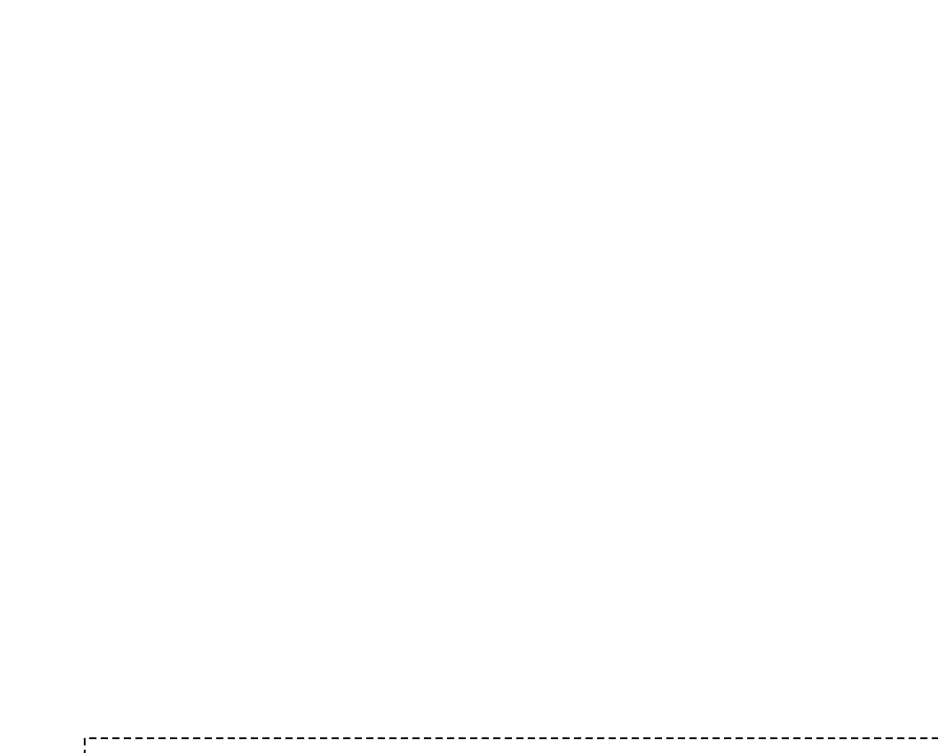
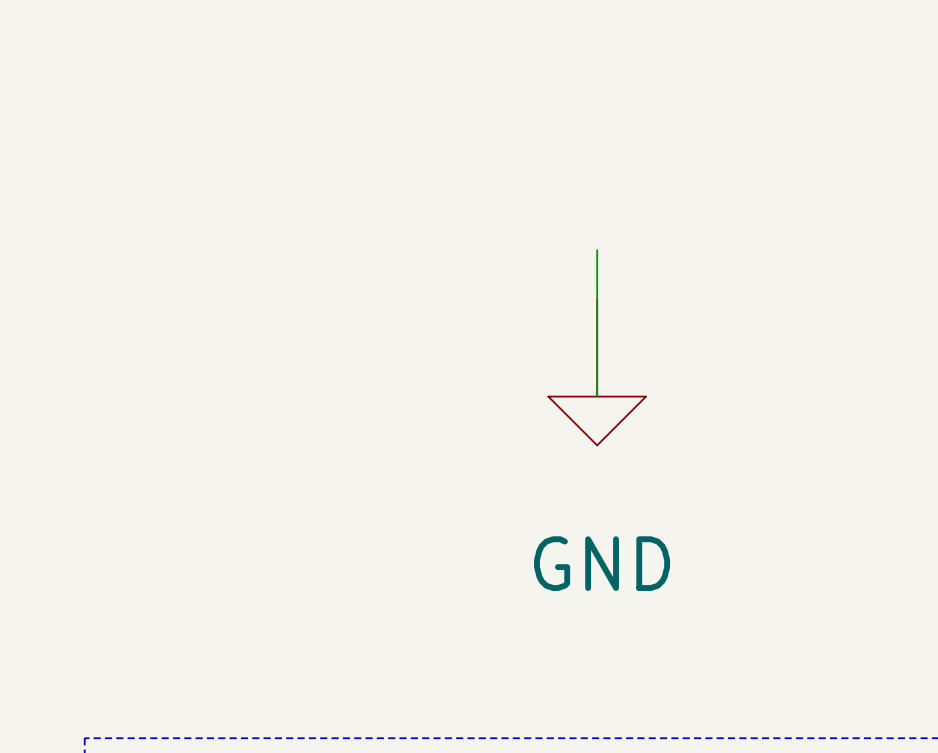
wire: none -> (597, 250) (597, 396)
power symbol: none -> GND (597, 372)

